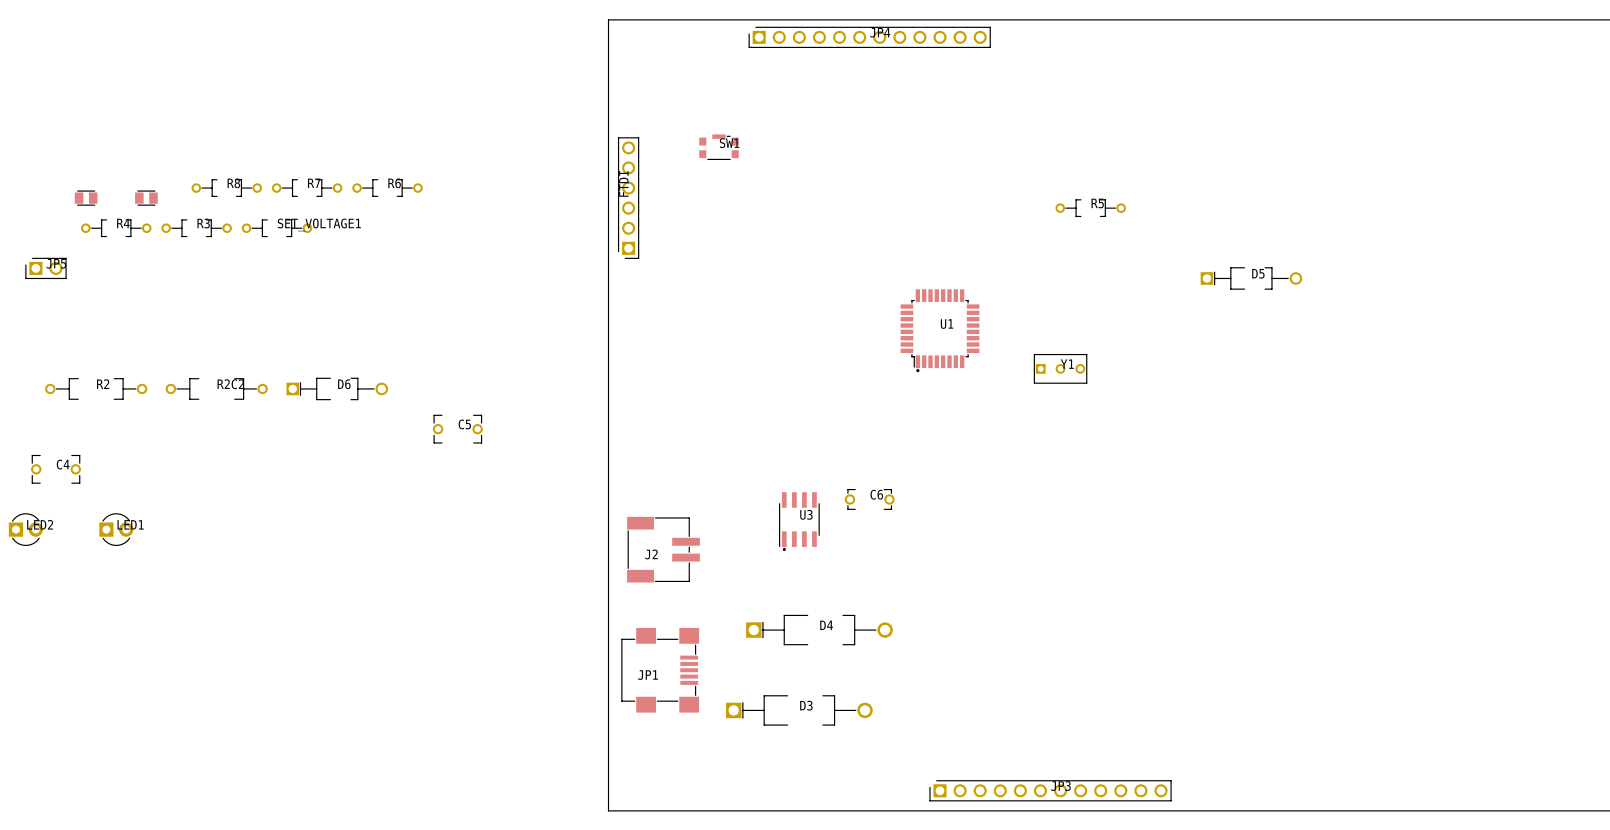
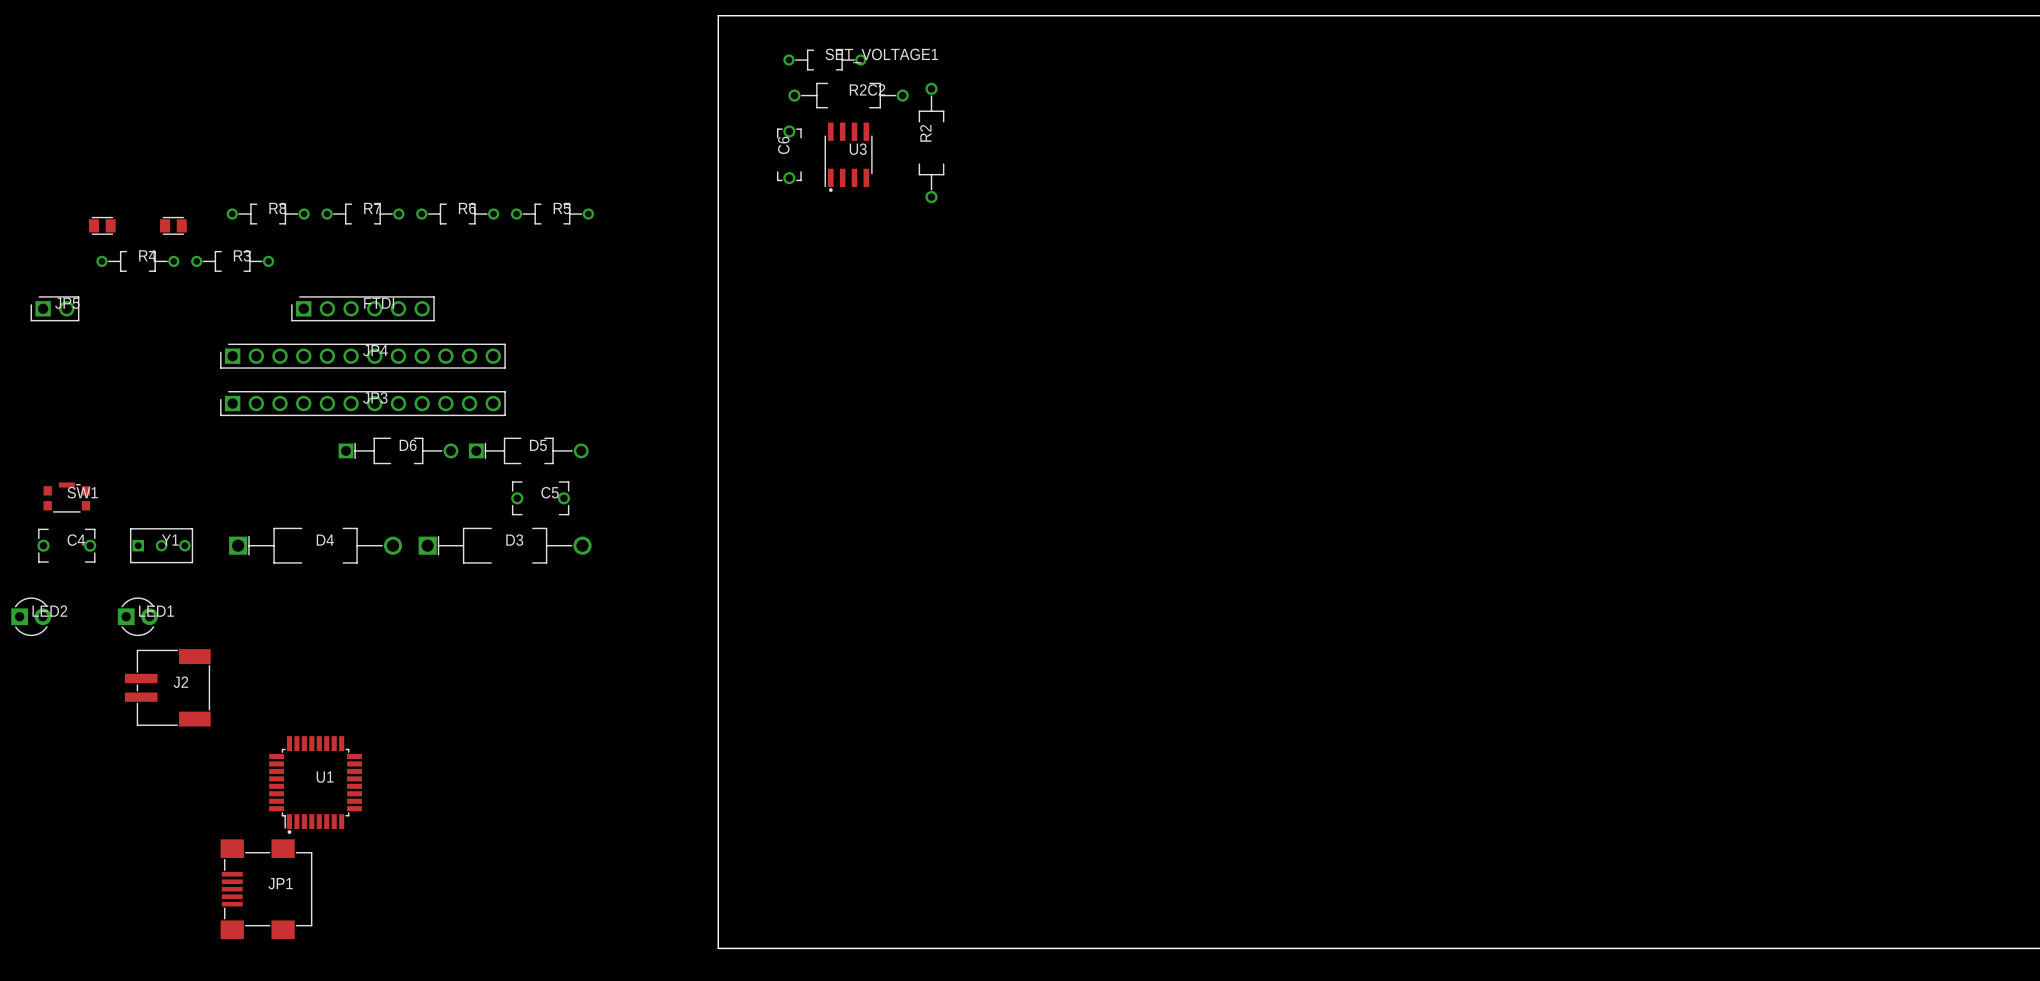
JP4 position: (869, 37) -> (362, 356)
SW1 position: (719, 147) -> (66, 497)
FTDI: (628, 198) -> none
R5 position: (1090, 208) -> (552, 214)
SET_VOLTAGE1 position: (277, 228) -> (824, 60)
FTDI: none -> (362, 308)
D5 position: (1251, 278) -> (528, 450)
U1 position: (940, 330) -> (315, 785)
Y1 position: (1060, 368) -> (161, 545)
R2 name position: R2 (103, 384) -> R2 (925, 133)
R2 rotation: 0° (96, 388) -> 90° clockwise (931, 142)
R2 position: (96, 388) -> (931, 142)
R2C2 position: (216, 388) -> (848, 95)
C6 name position: C6 (876, 494) -> C6 (783, 145)
C6 rotation: 0° (869, 499) -> 90° clockwise (789, 154)
C6 position: (869, 499) -> (789, 154)
U3 position: (799, 521) -> (848, 157)
J2 rotation: 0° (663, 549) -> 180° (167, 687)
J2 position: (663, 549) -> (167, 687)
D4 position: (819, 630) -> (315, 545)
JP1 rotation: 0° (660, 670) -> 180° (266, 889)
JP1 position: (660, 670) -> (266, 889)
D3 position: (799, 710) -> (505, 545)
JP3 position: (1050, 790) -> (362, 403)

